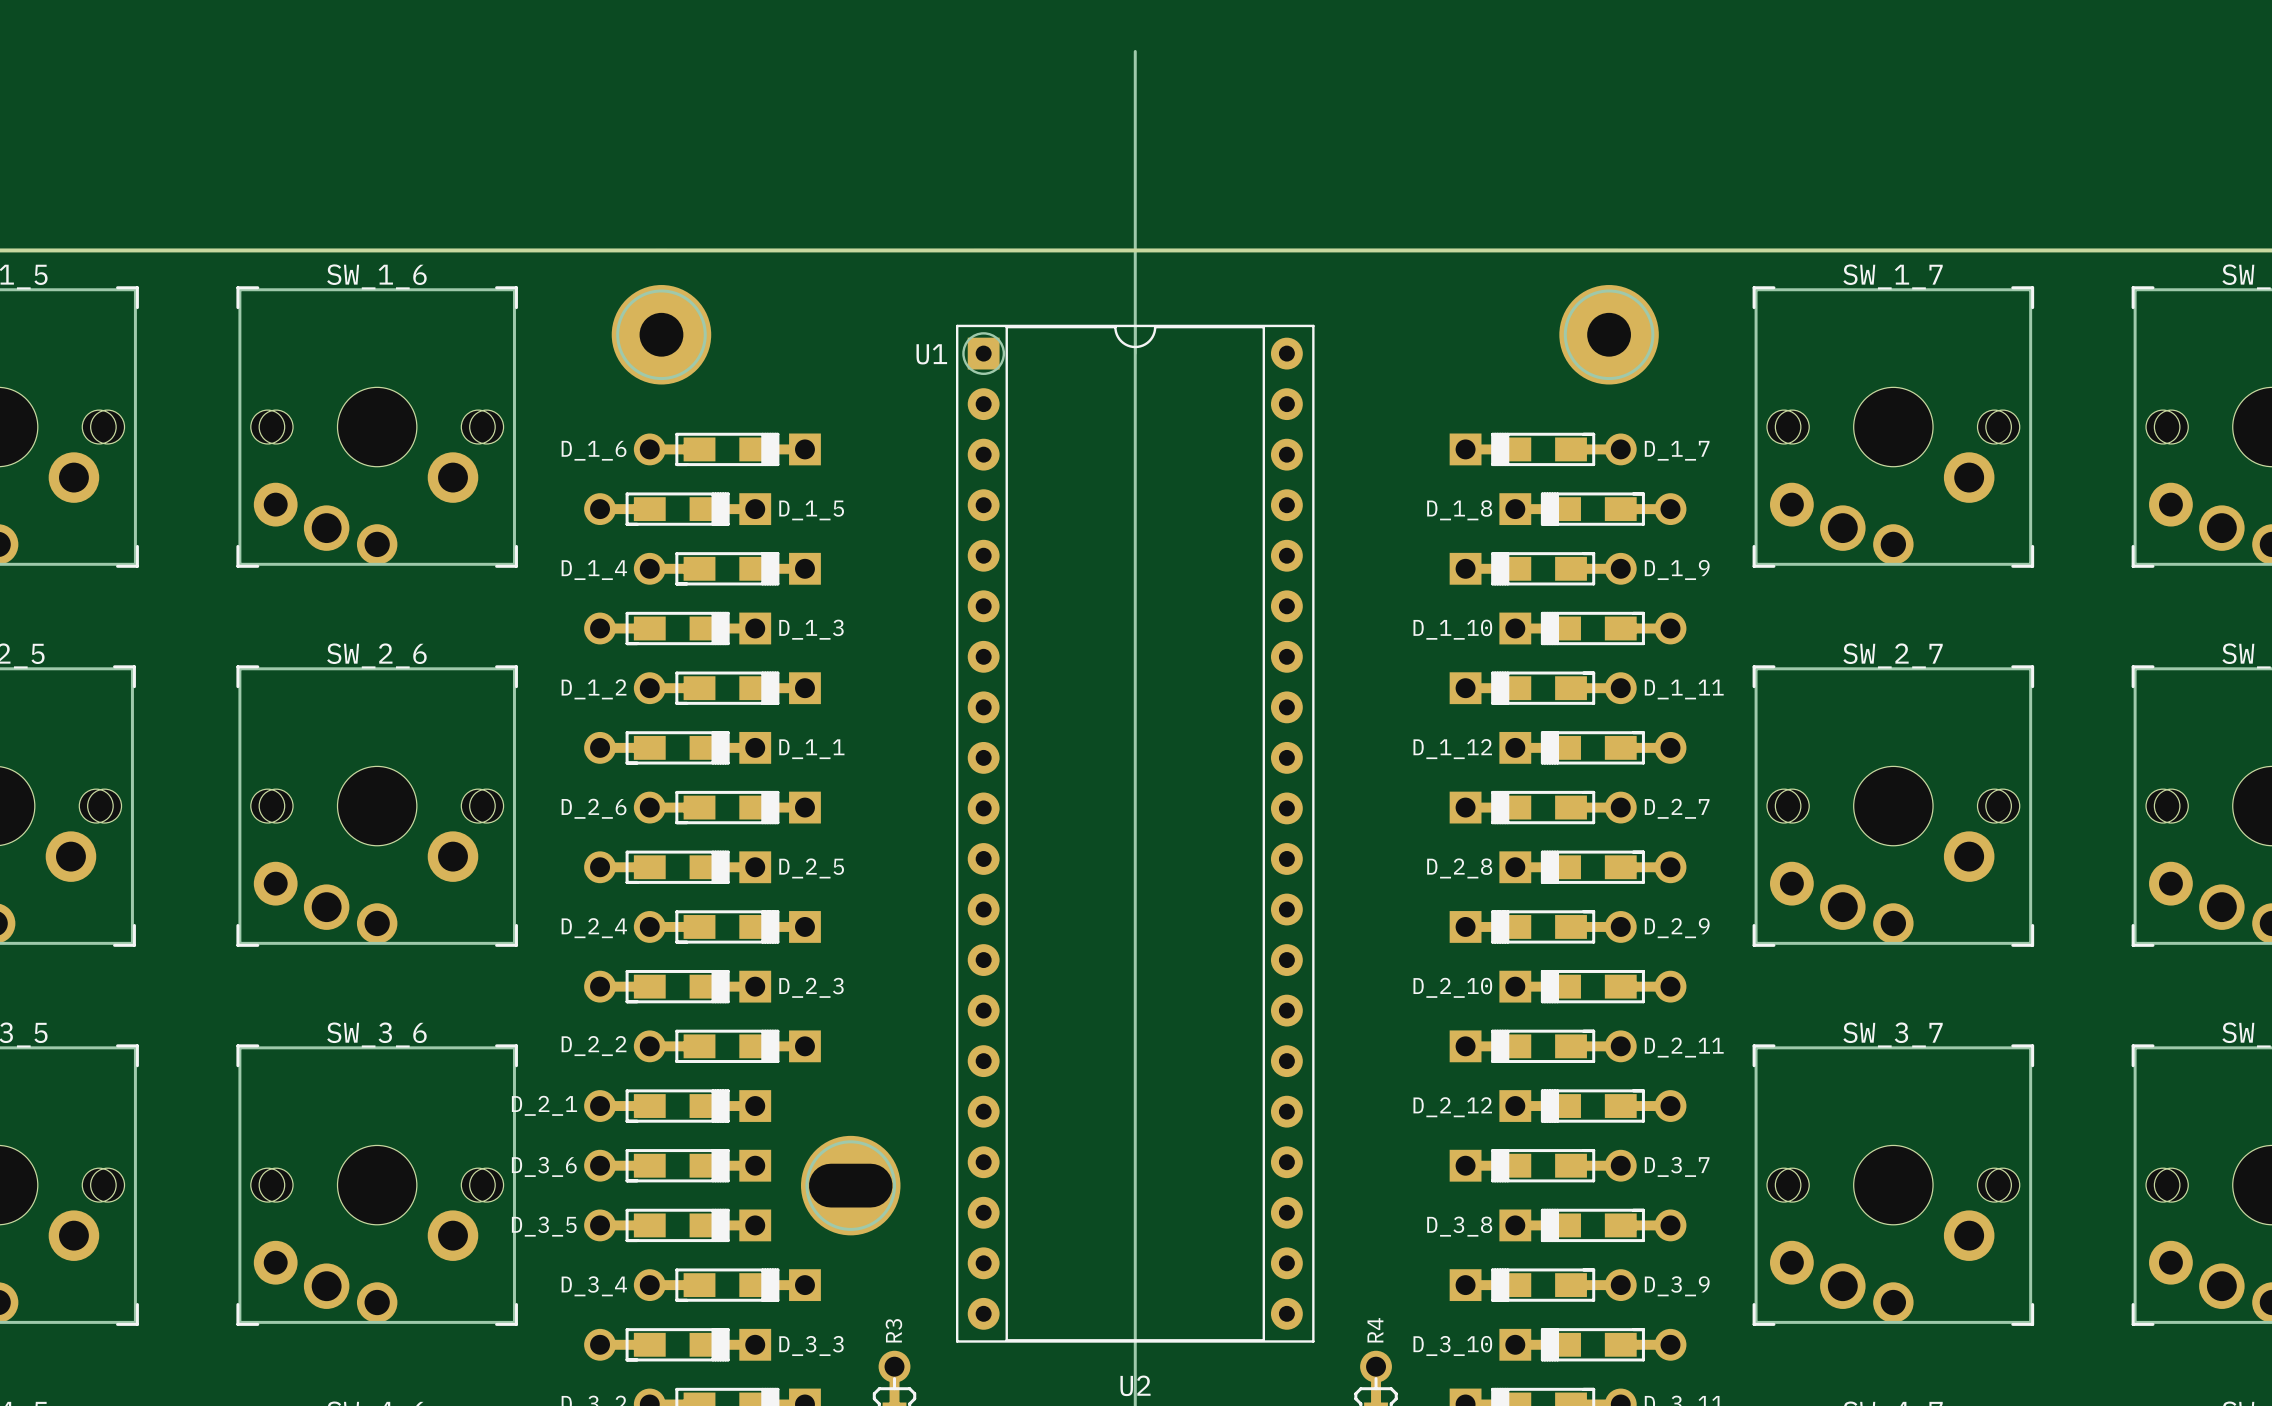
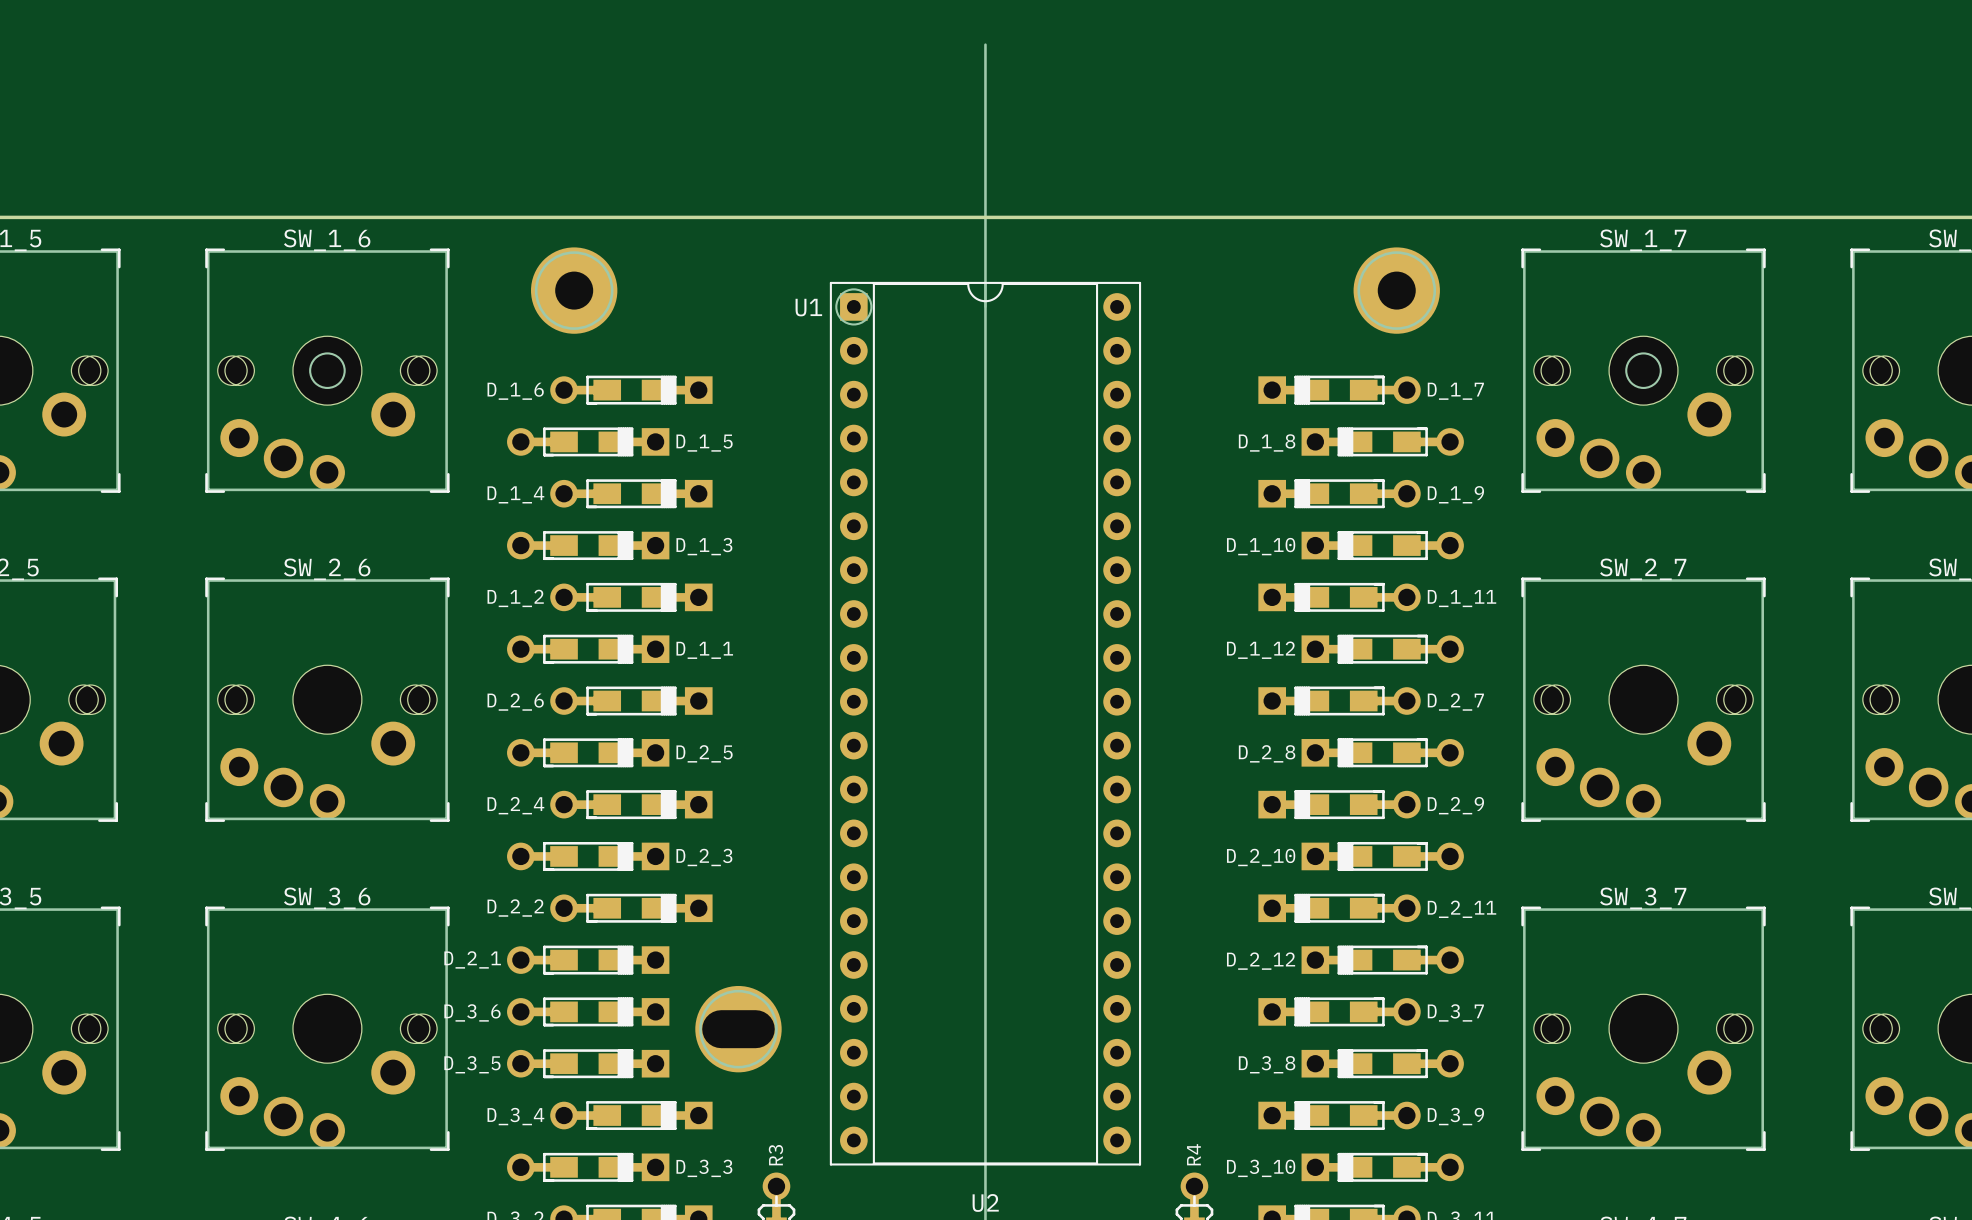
SW_1_6 footprint: [236, 286, 518, 568] -> [205, 248, 450, 493]
SW_1_7 footprint: [1752, 286, 2035, 568] -> [1521, 248, 1766, 493]

